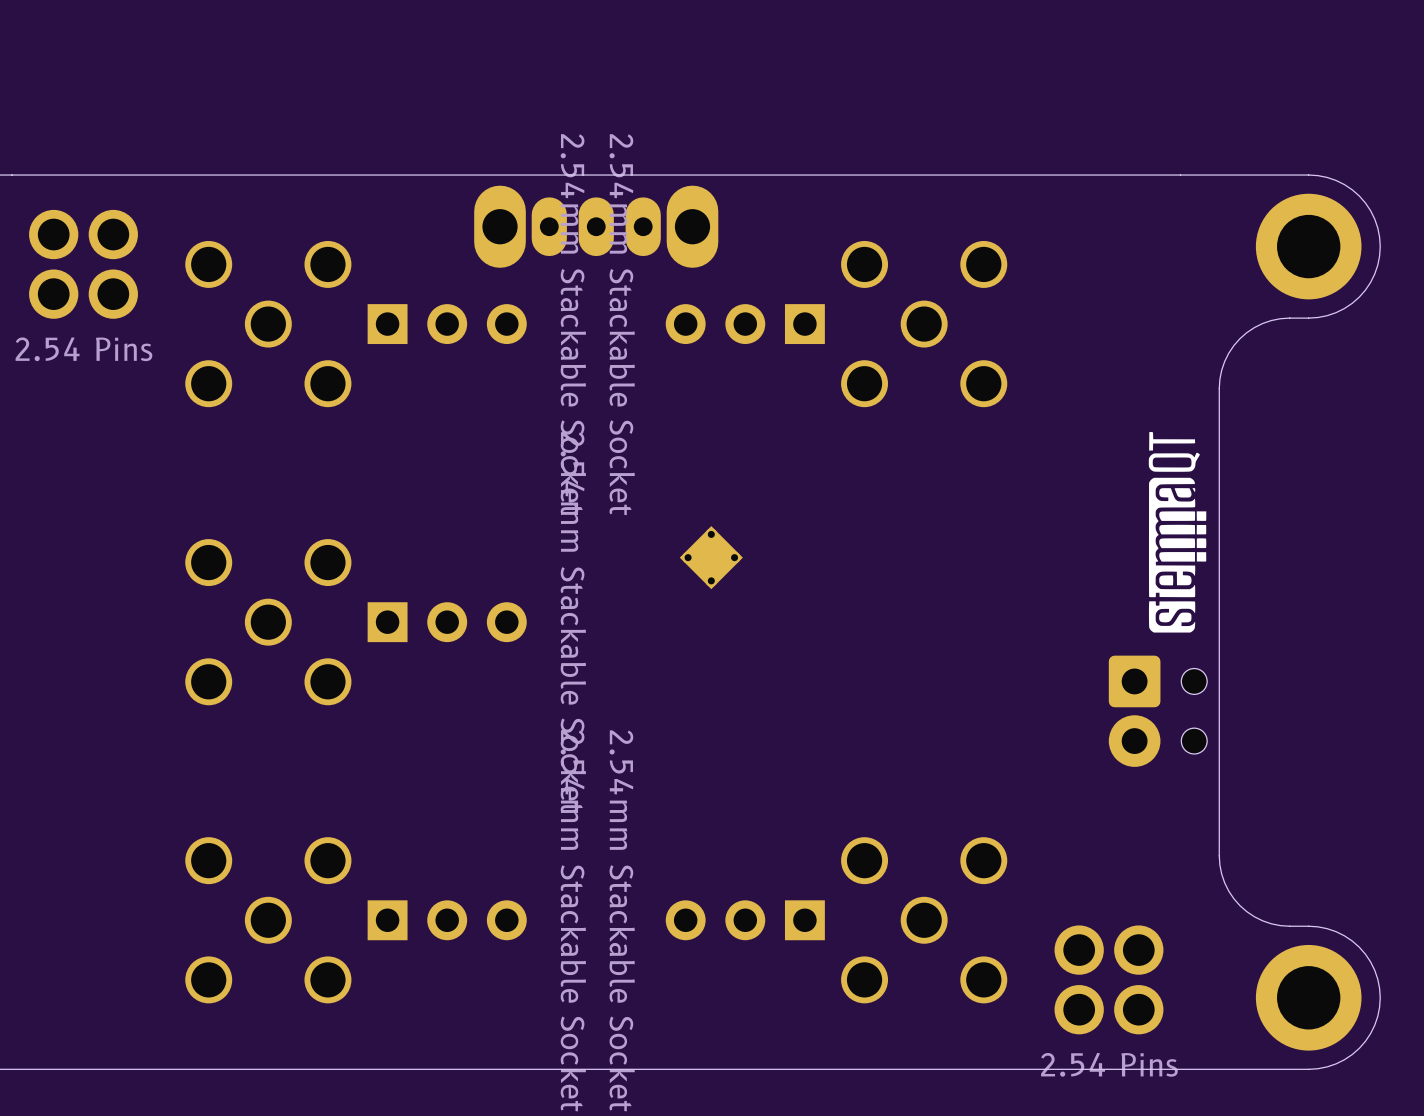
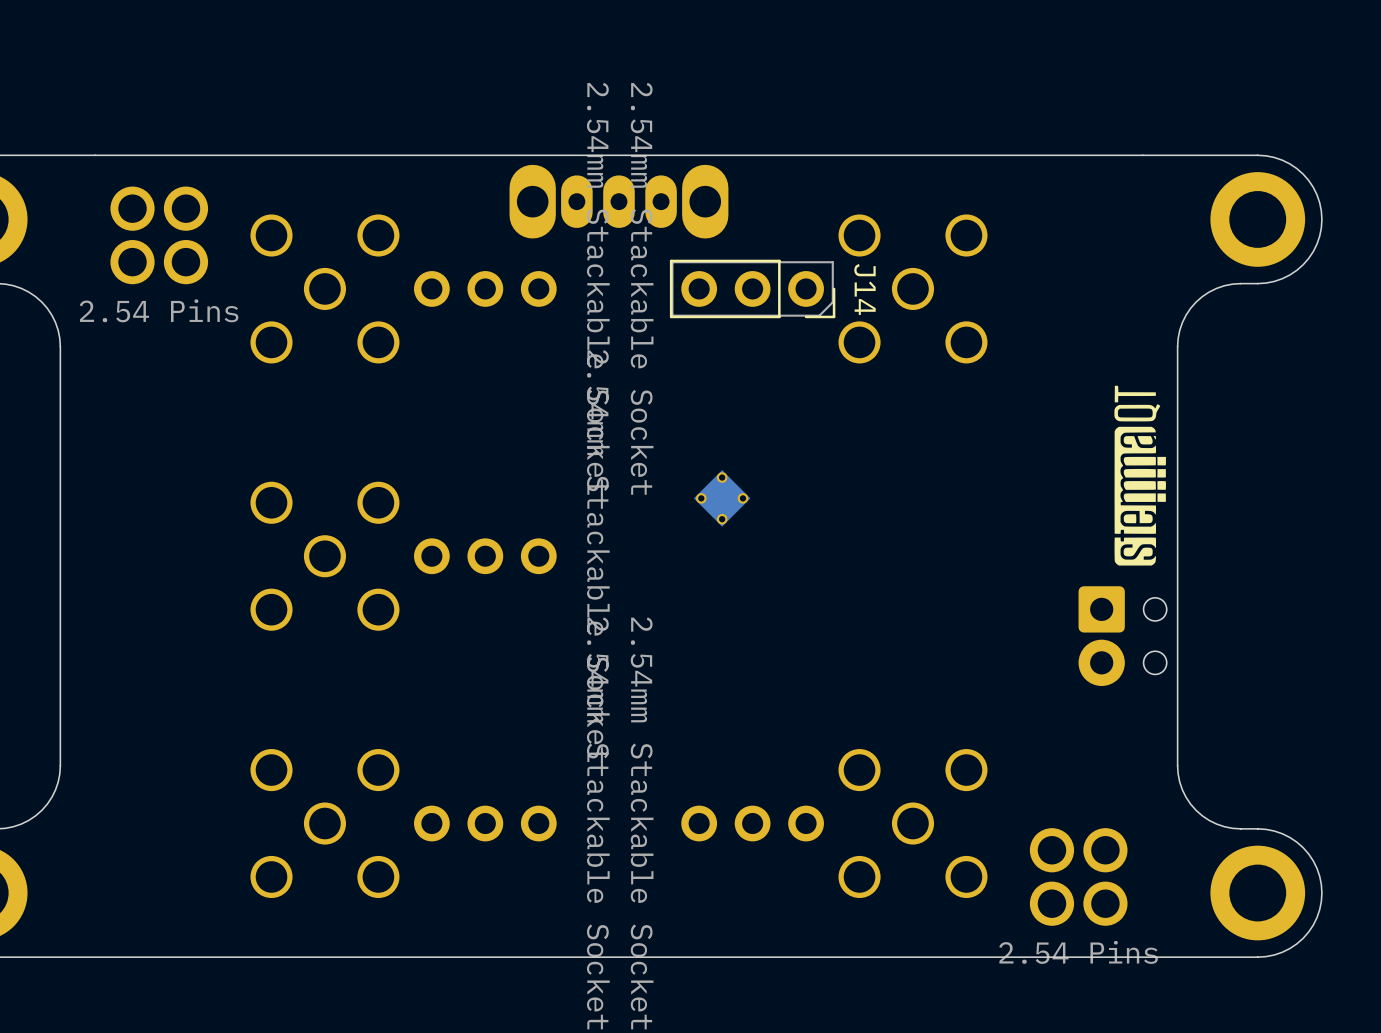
part footprint: [367, 304, 527, 345] -> [413, 271, 557, 307]
part: 2.54mm Stackable Socket (745, 324) -> none
J14: none -> 2.54mm Stackable Socket (752, 288)
part footprint: [367, 602, 527, 643] -> [413, 538, 557, 575]
part footprint: [367, 900, 527, 941] -> [413, 805, 557, 842]
part footprint: [665, 900, 825, 941] -> [681, 805, 824, 842]

